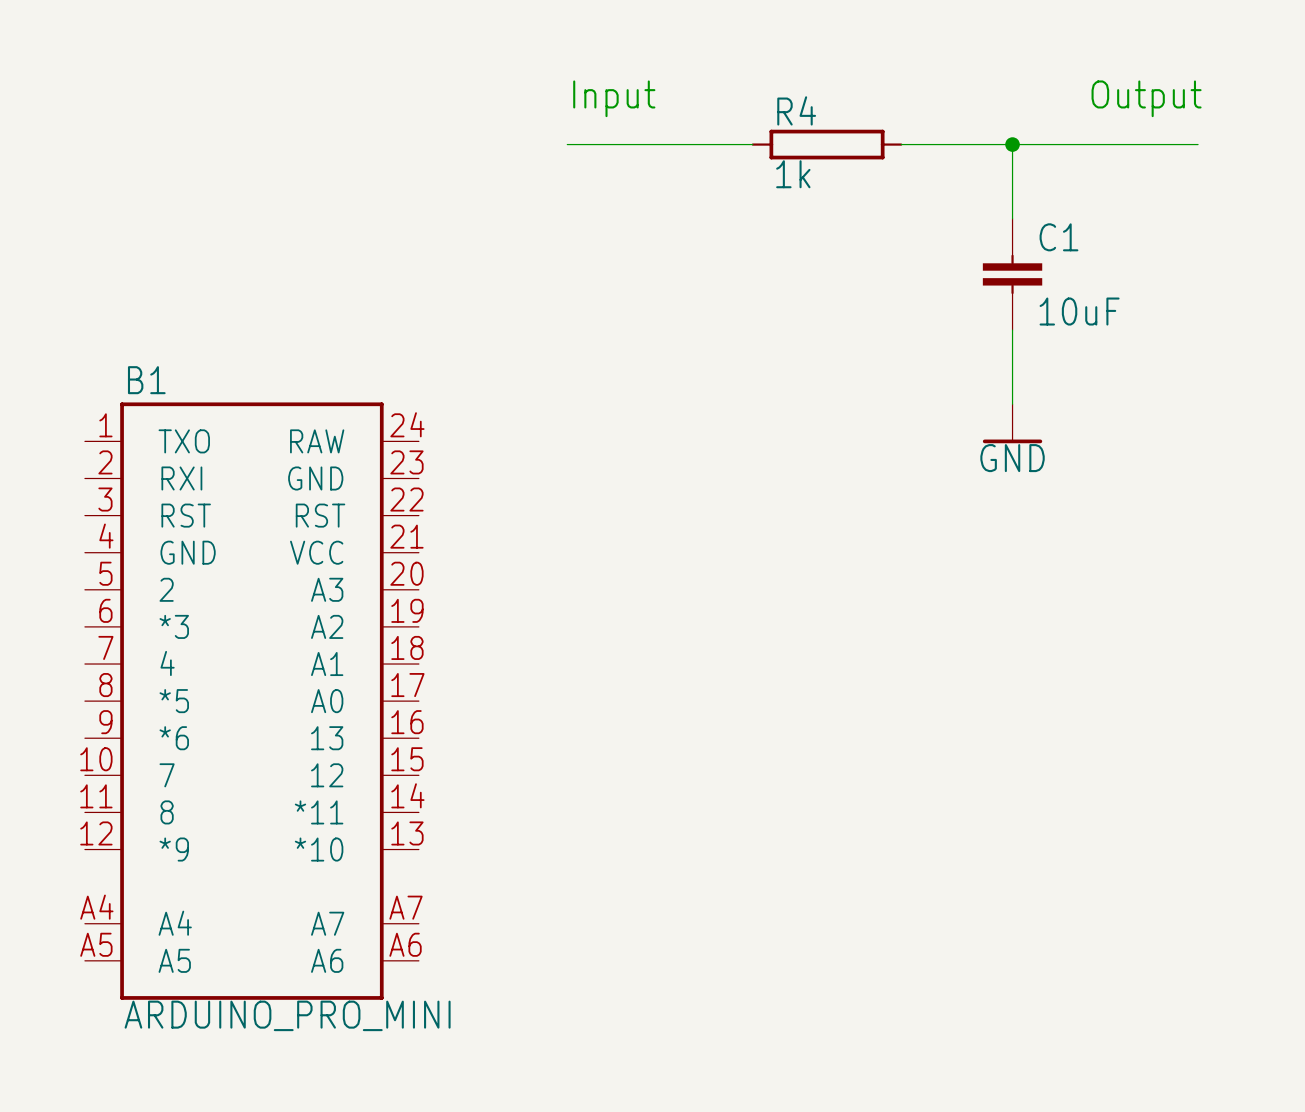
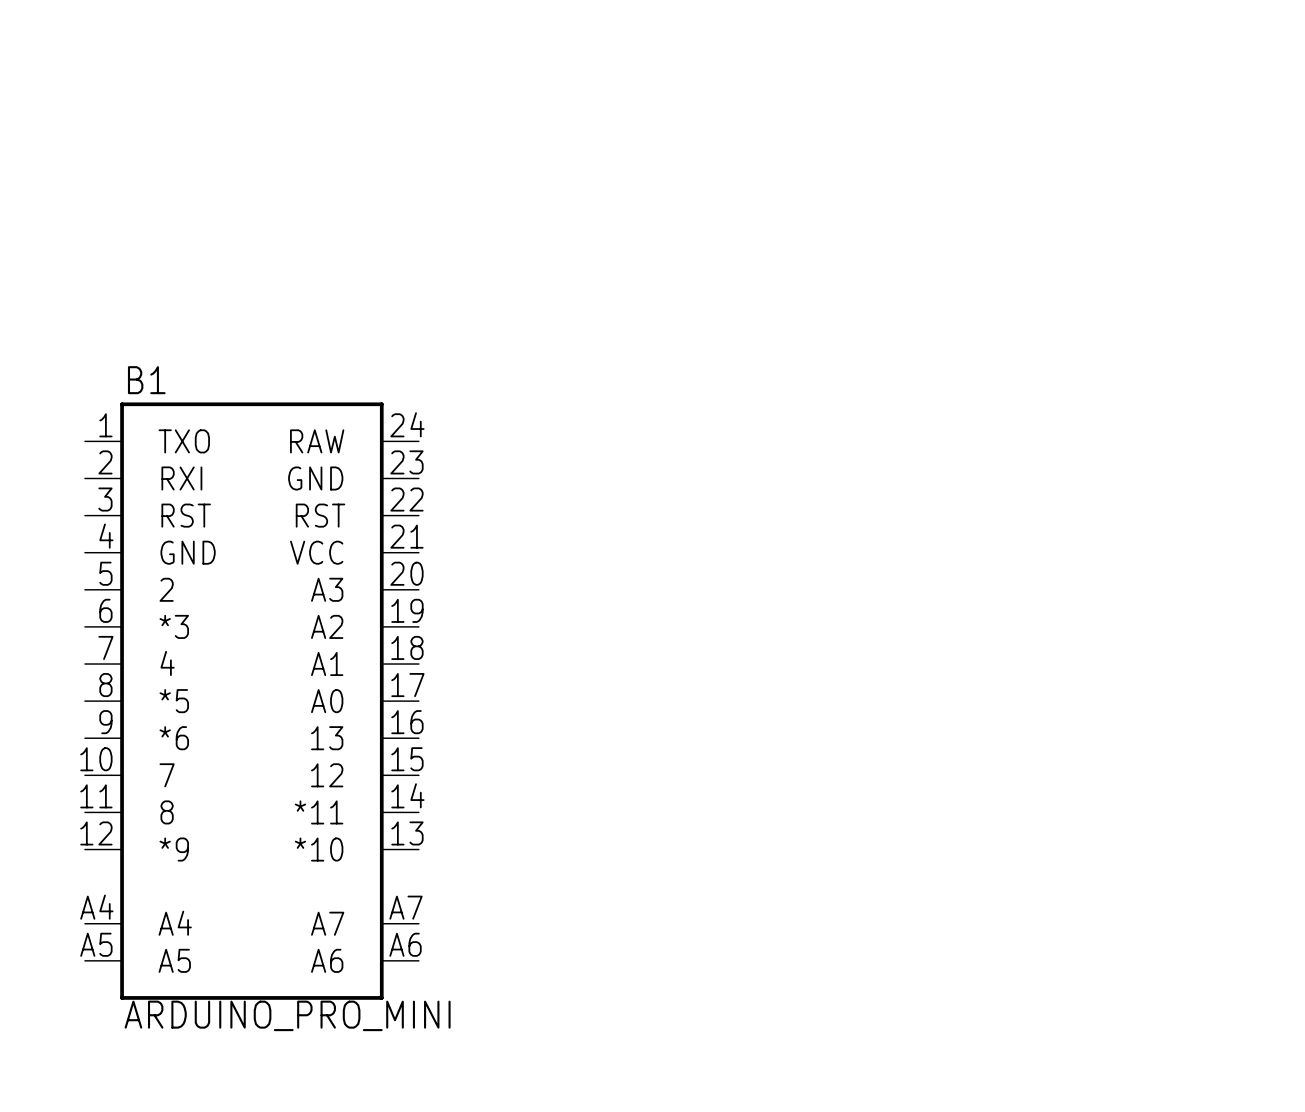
text: Input (614, 98) -> none
text: Output (1146, 98) -> none
wire: (567, 144) (752, 144) -> none
R4: 1k (827, 144) -> none
wire: (901, 144) (1198, 144) -> none
wire: (1012, 144) (1012, 218) -> none
junction: (1012, 144) -> none
C1: 10uF (1012, 274) -> none
wire: (1012, 330) (1012, 404) -> none
power symbol: GND (1012, 423) -> none

